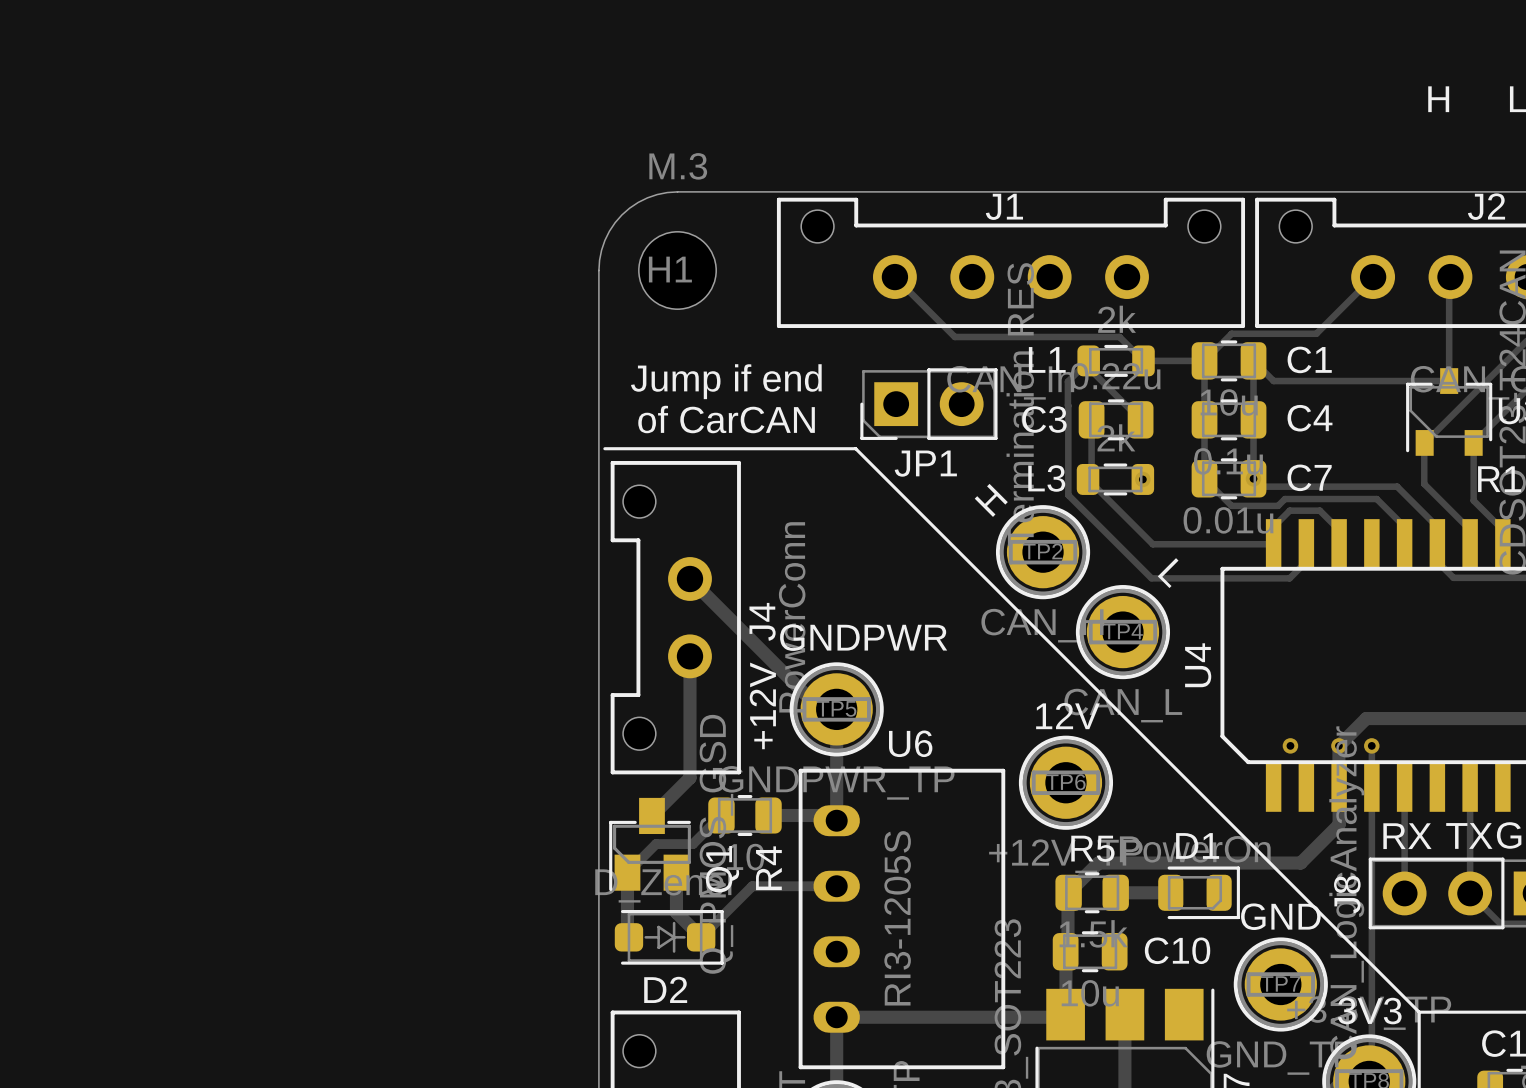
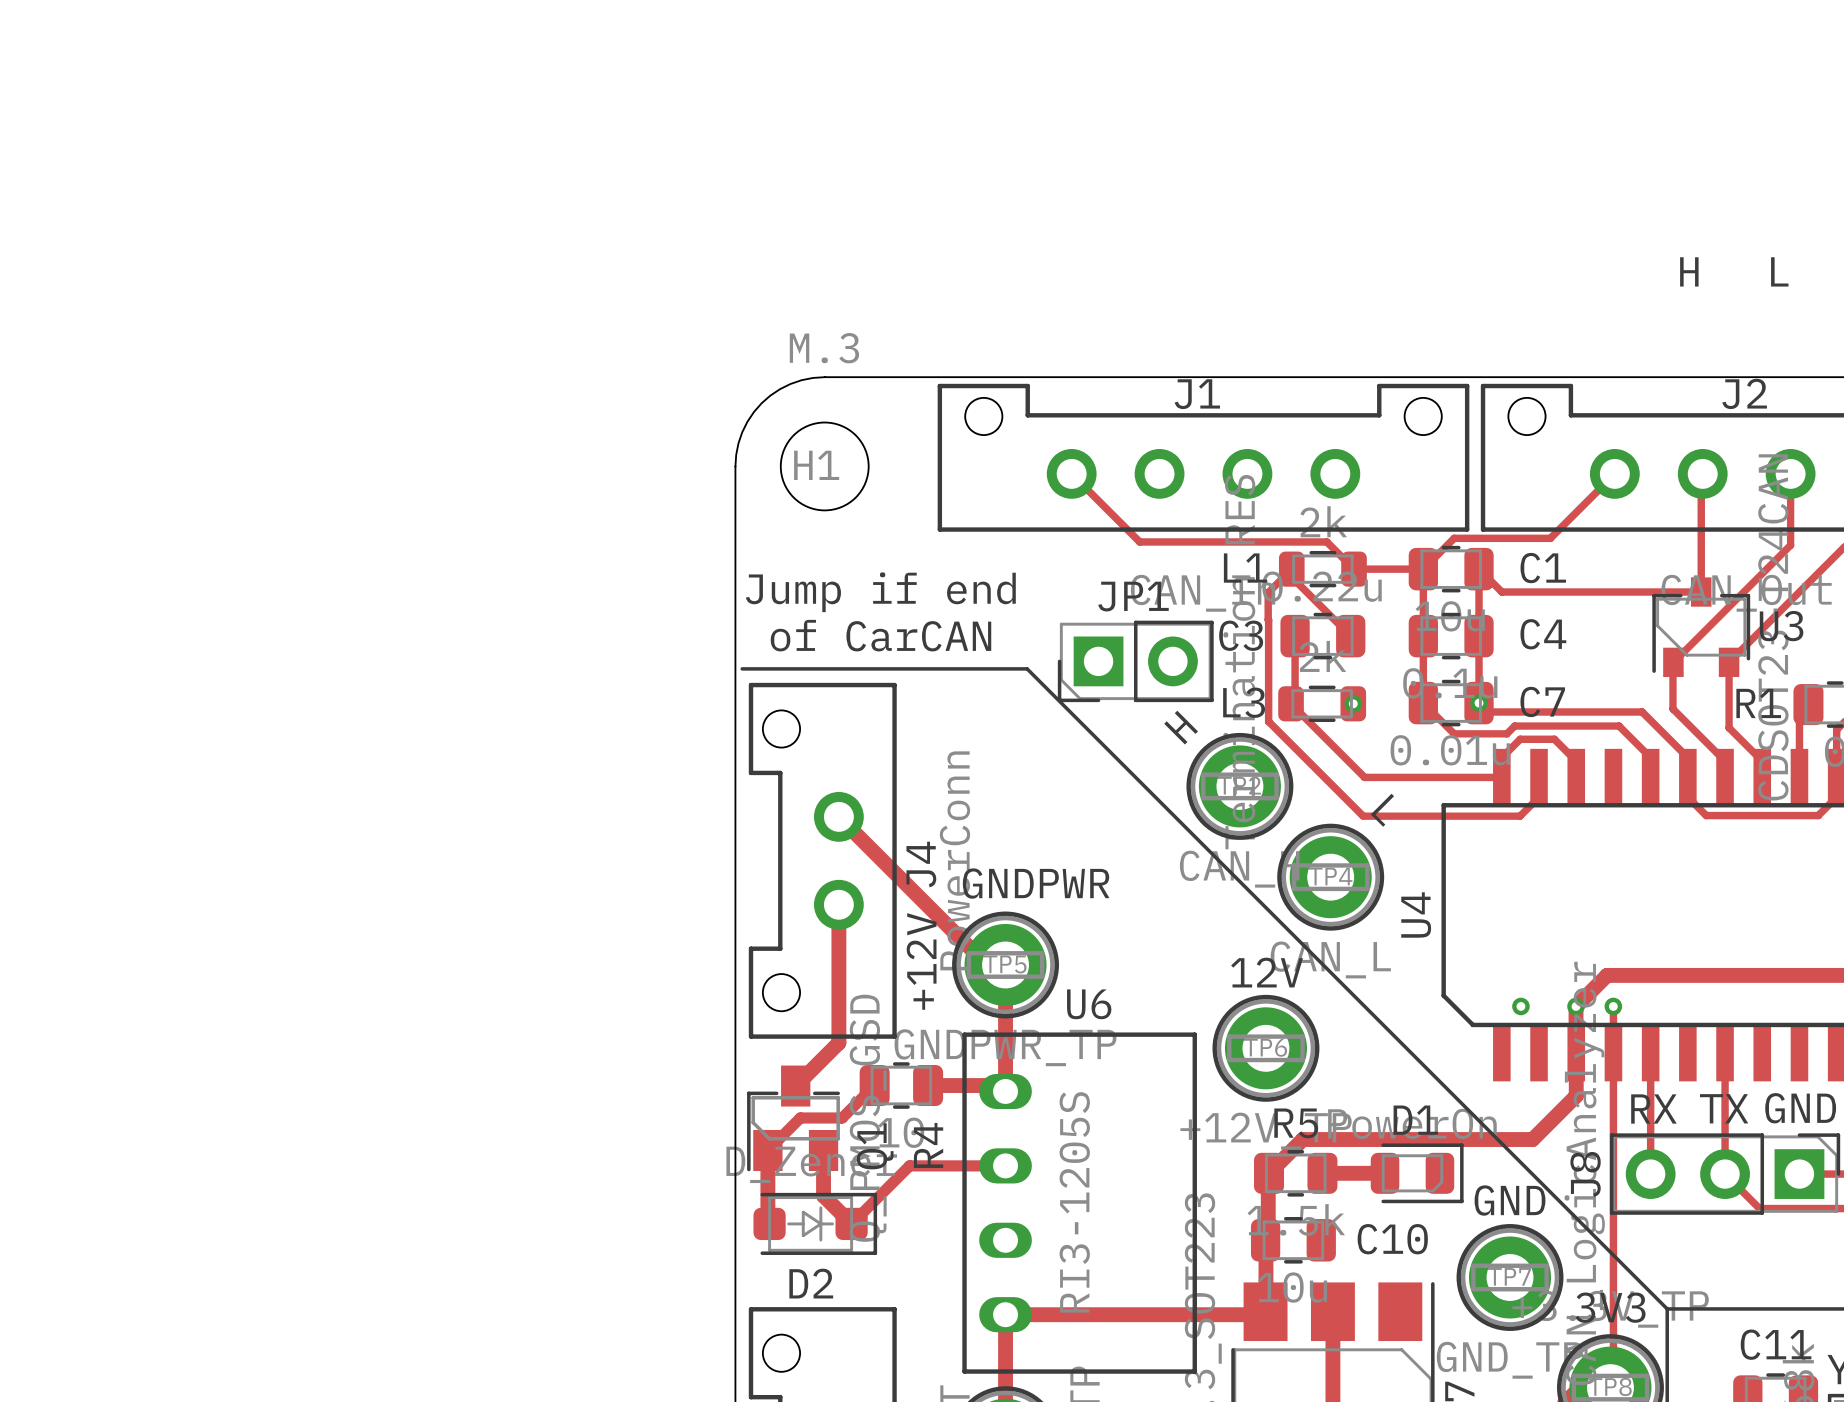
JP1 position: (928, 404) -> (1135, 661)
JP1 name position: JP1 (925, 463) -> JP1 (1133, 596)

